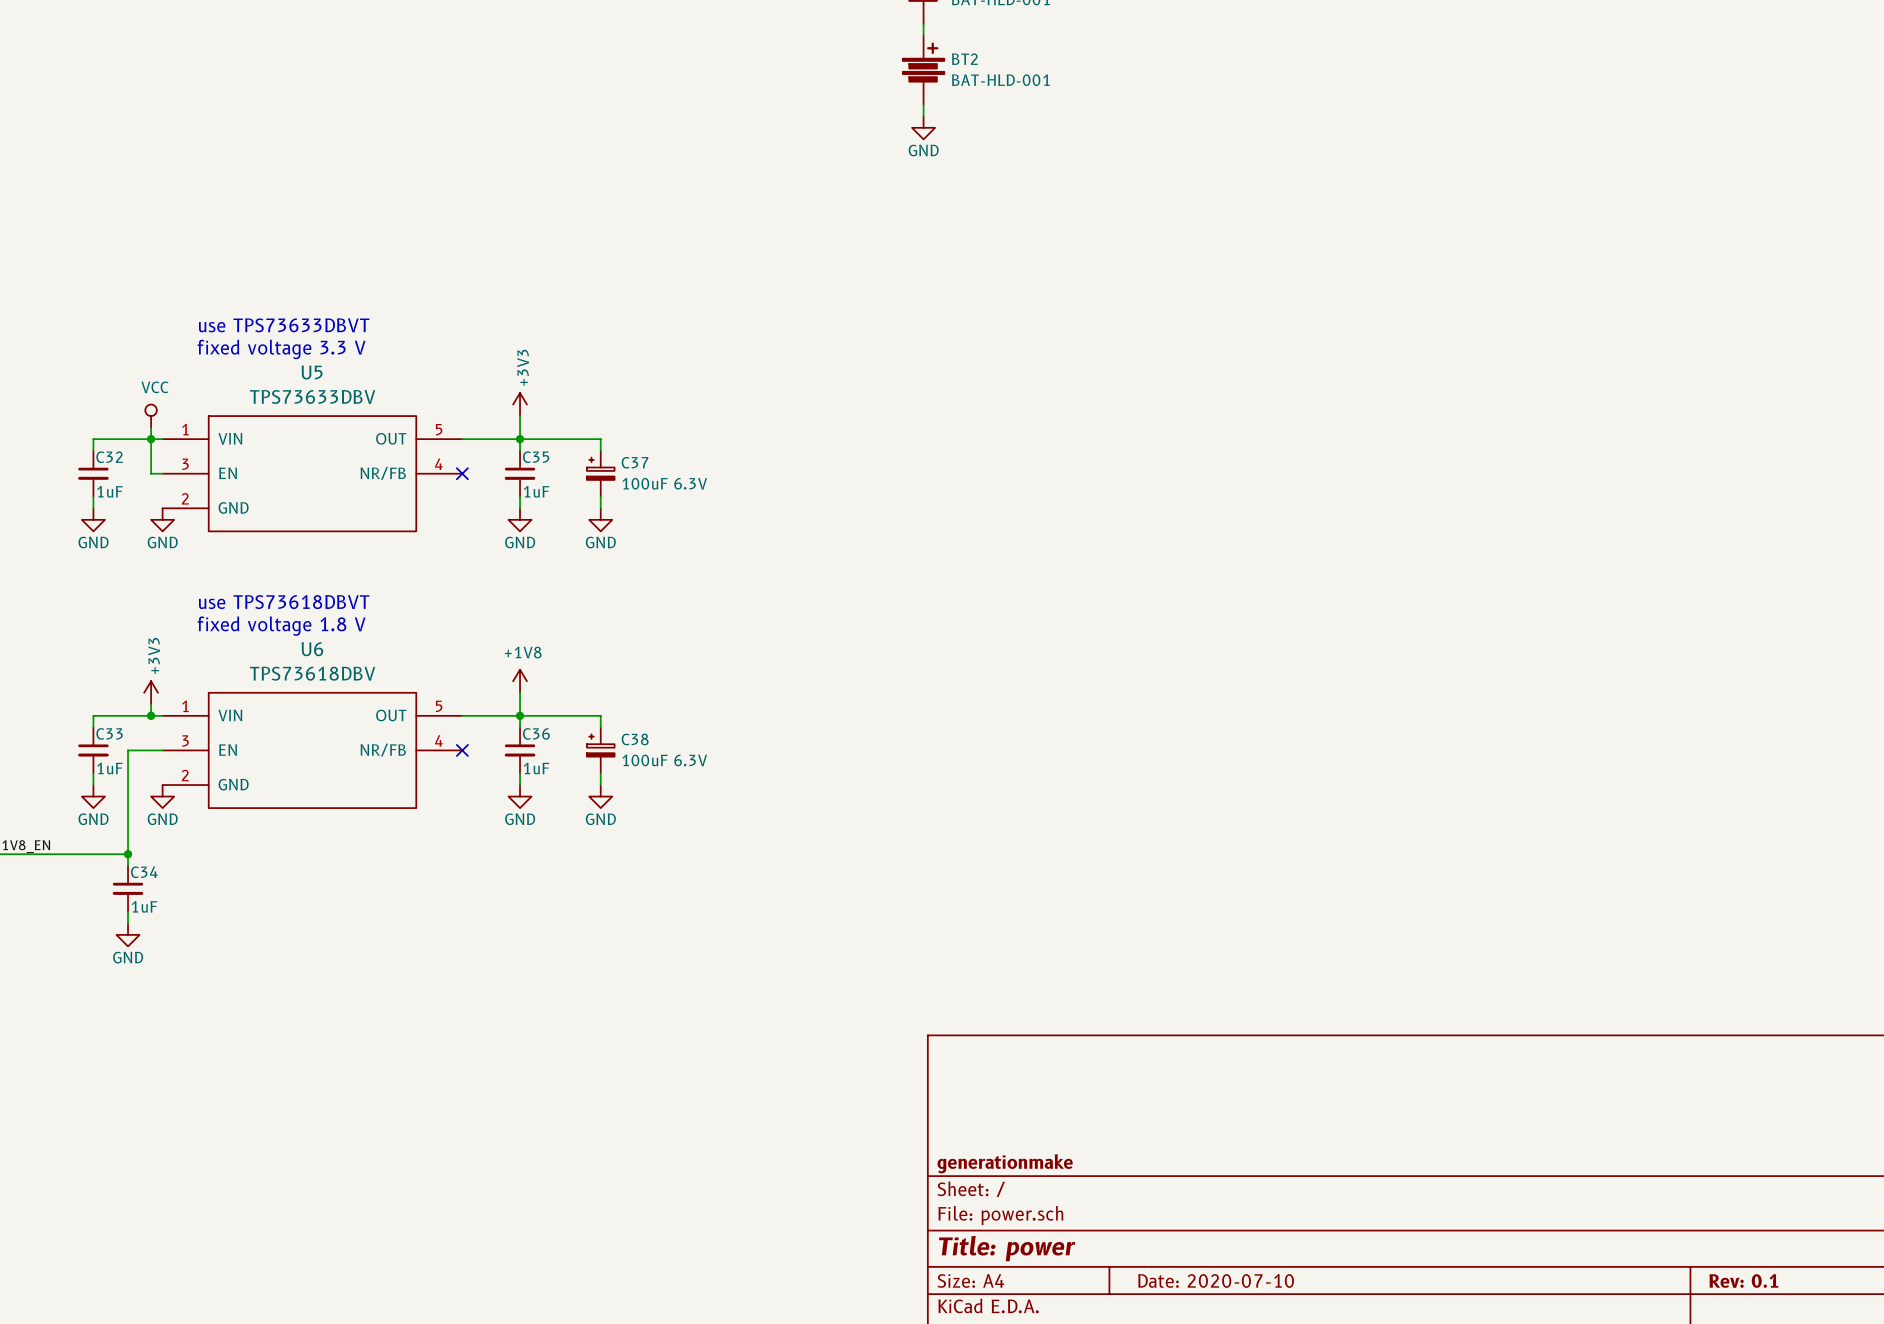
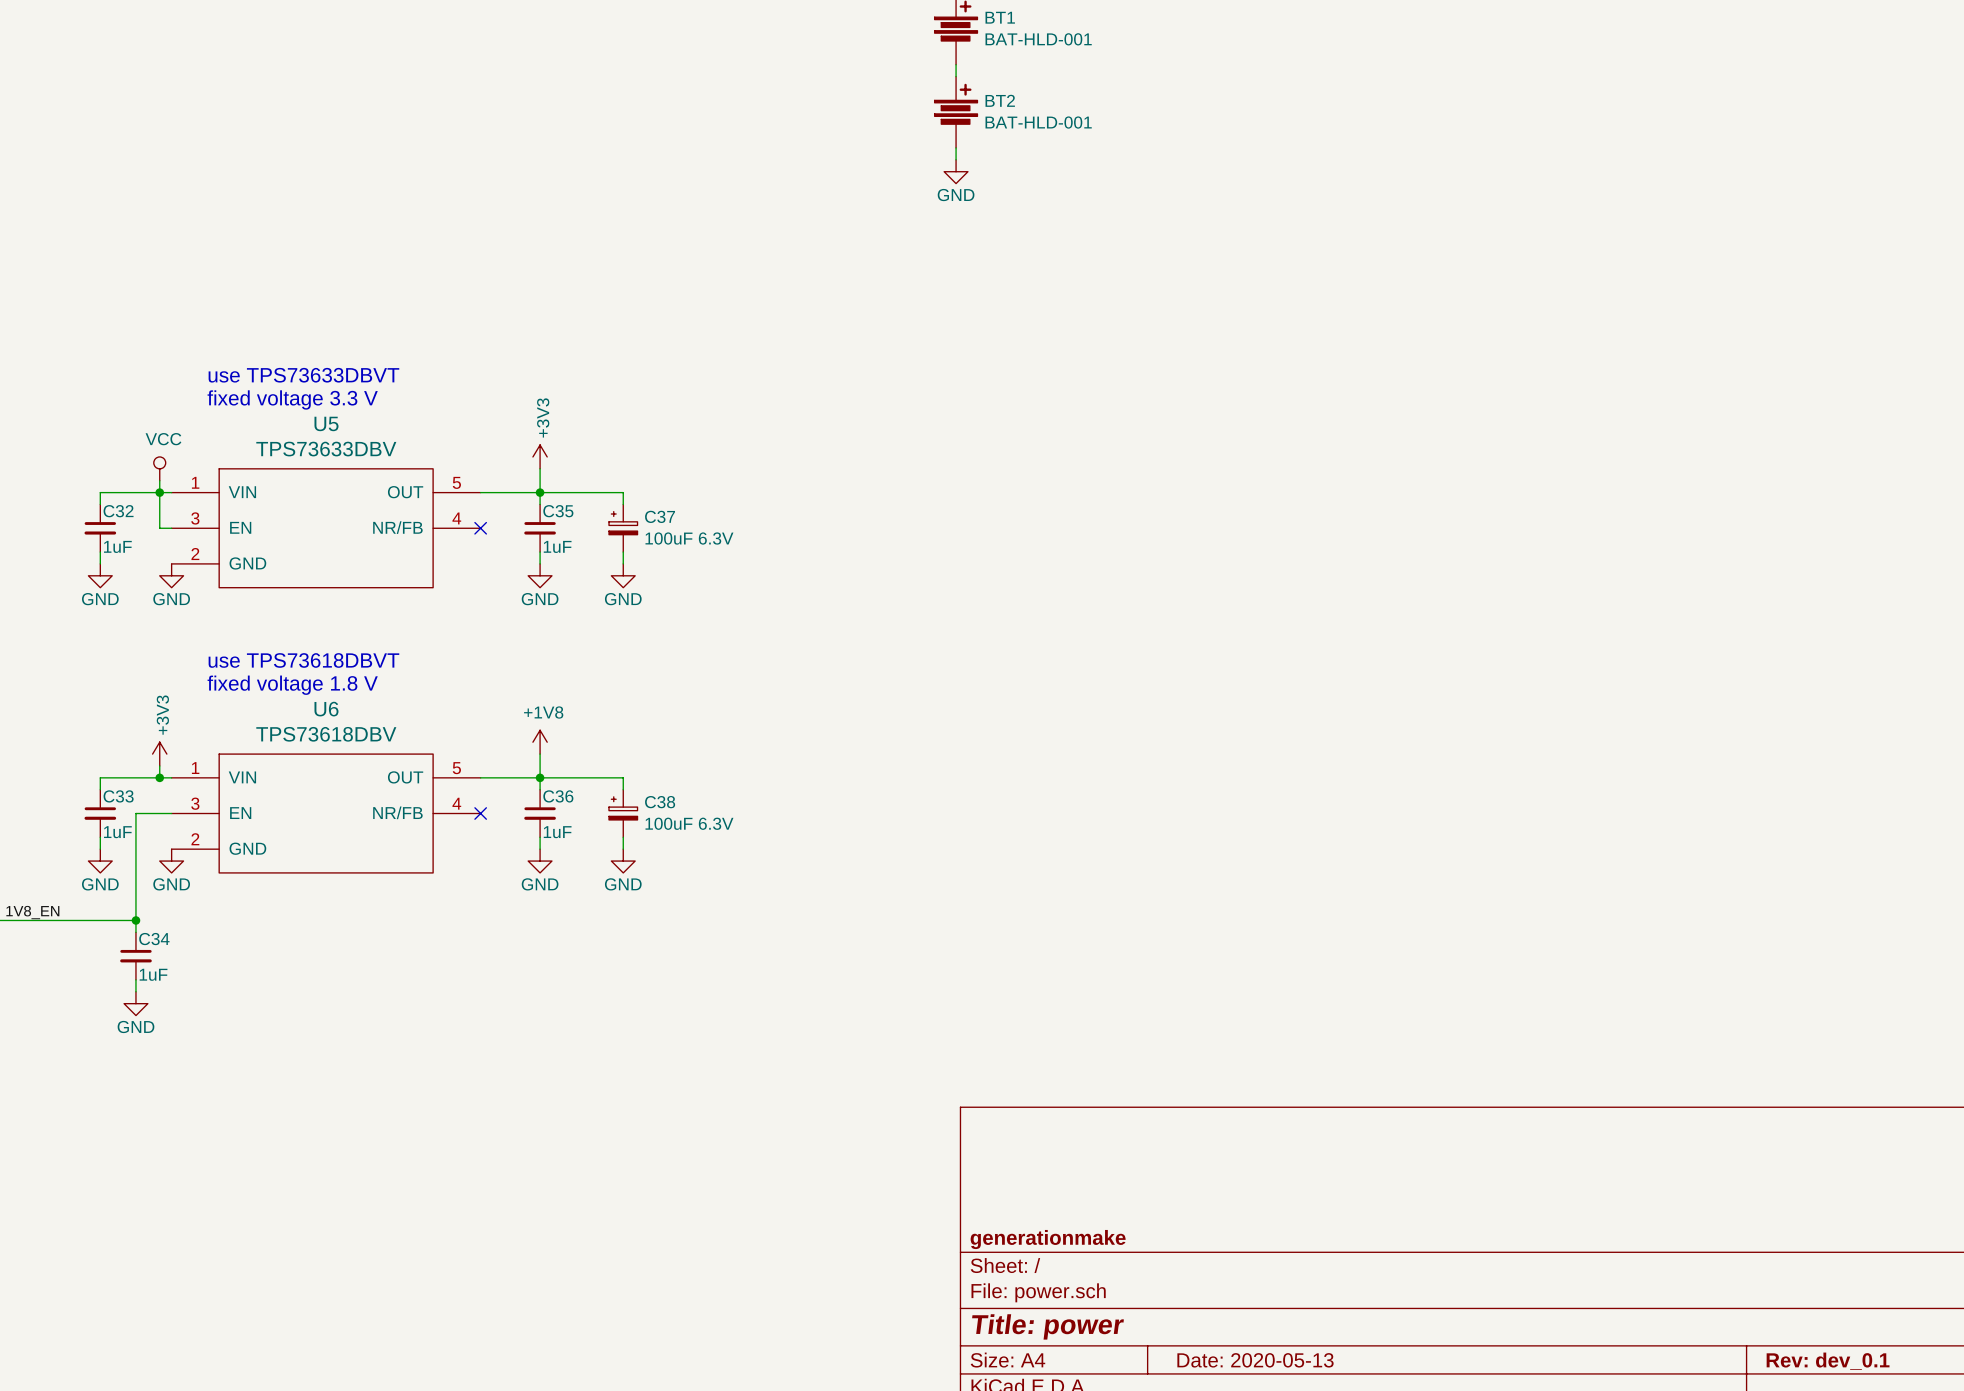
title block: Date: 2020-07-10 (1216, 1280) -> Date: 2020-05-13 (1255, 1360)
title block: Rev: 0.1 (1743, 1281) -> Rev: dev_0.1 (1828, 1361)

